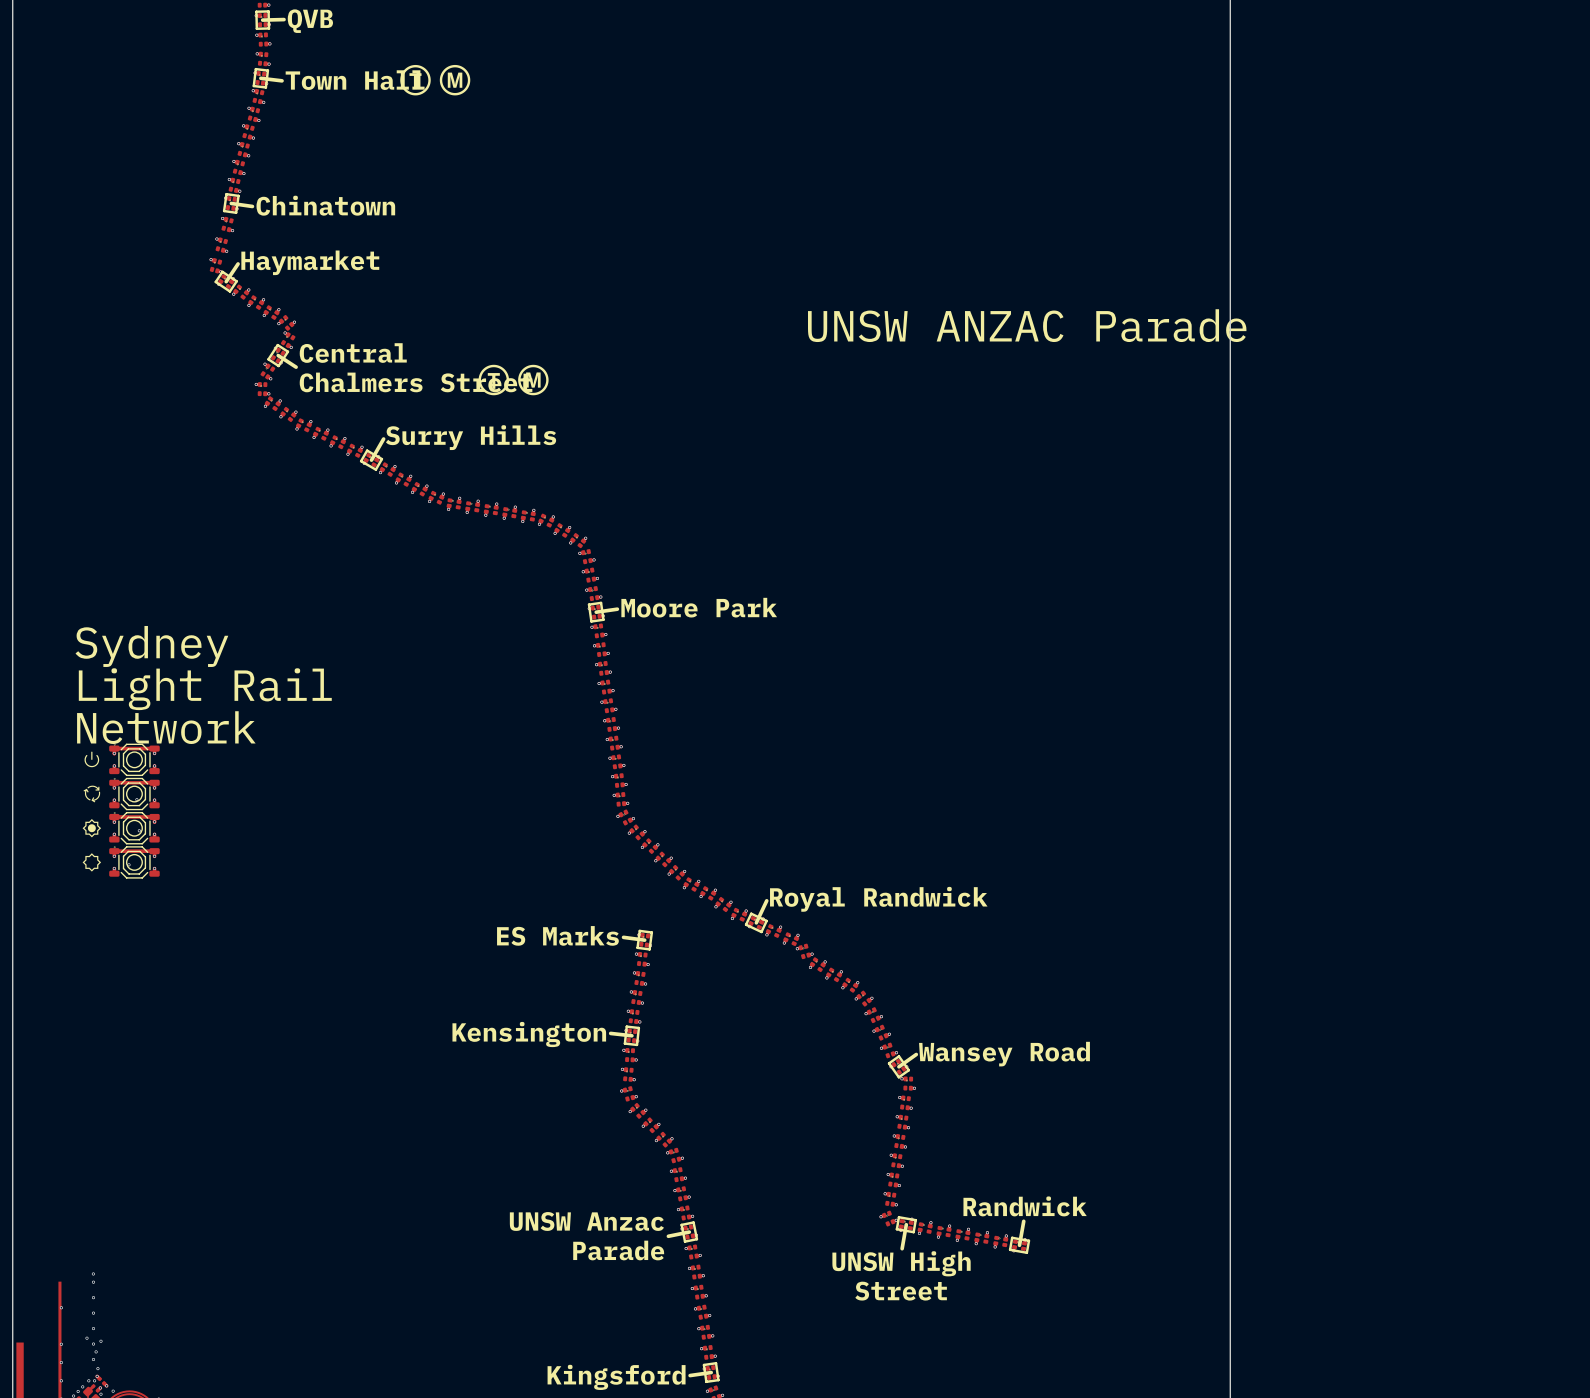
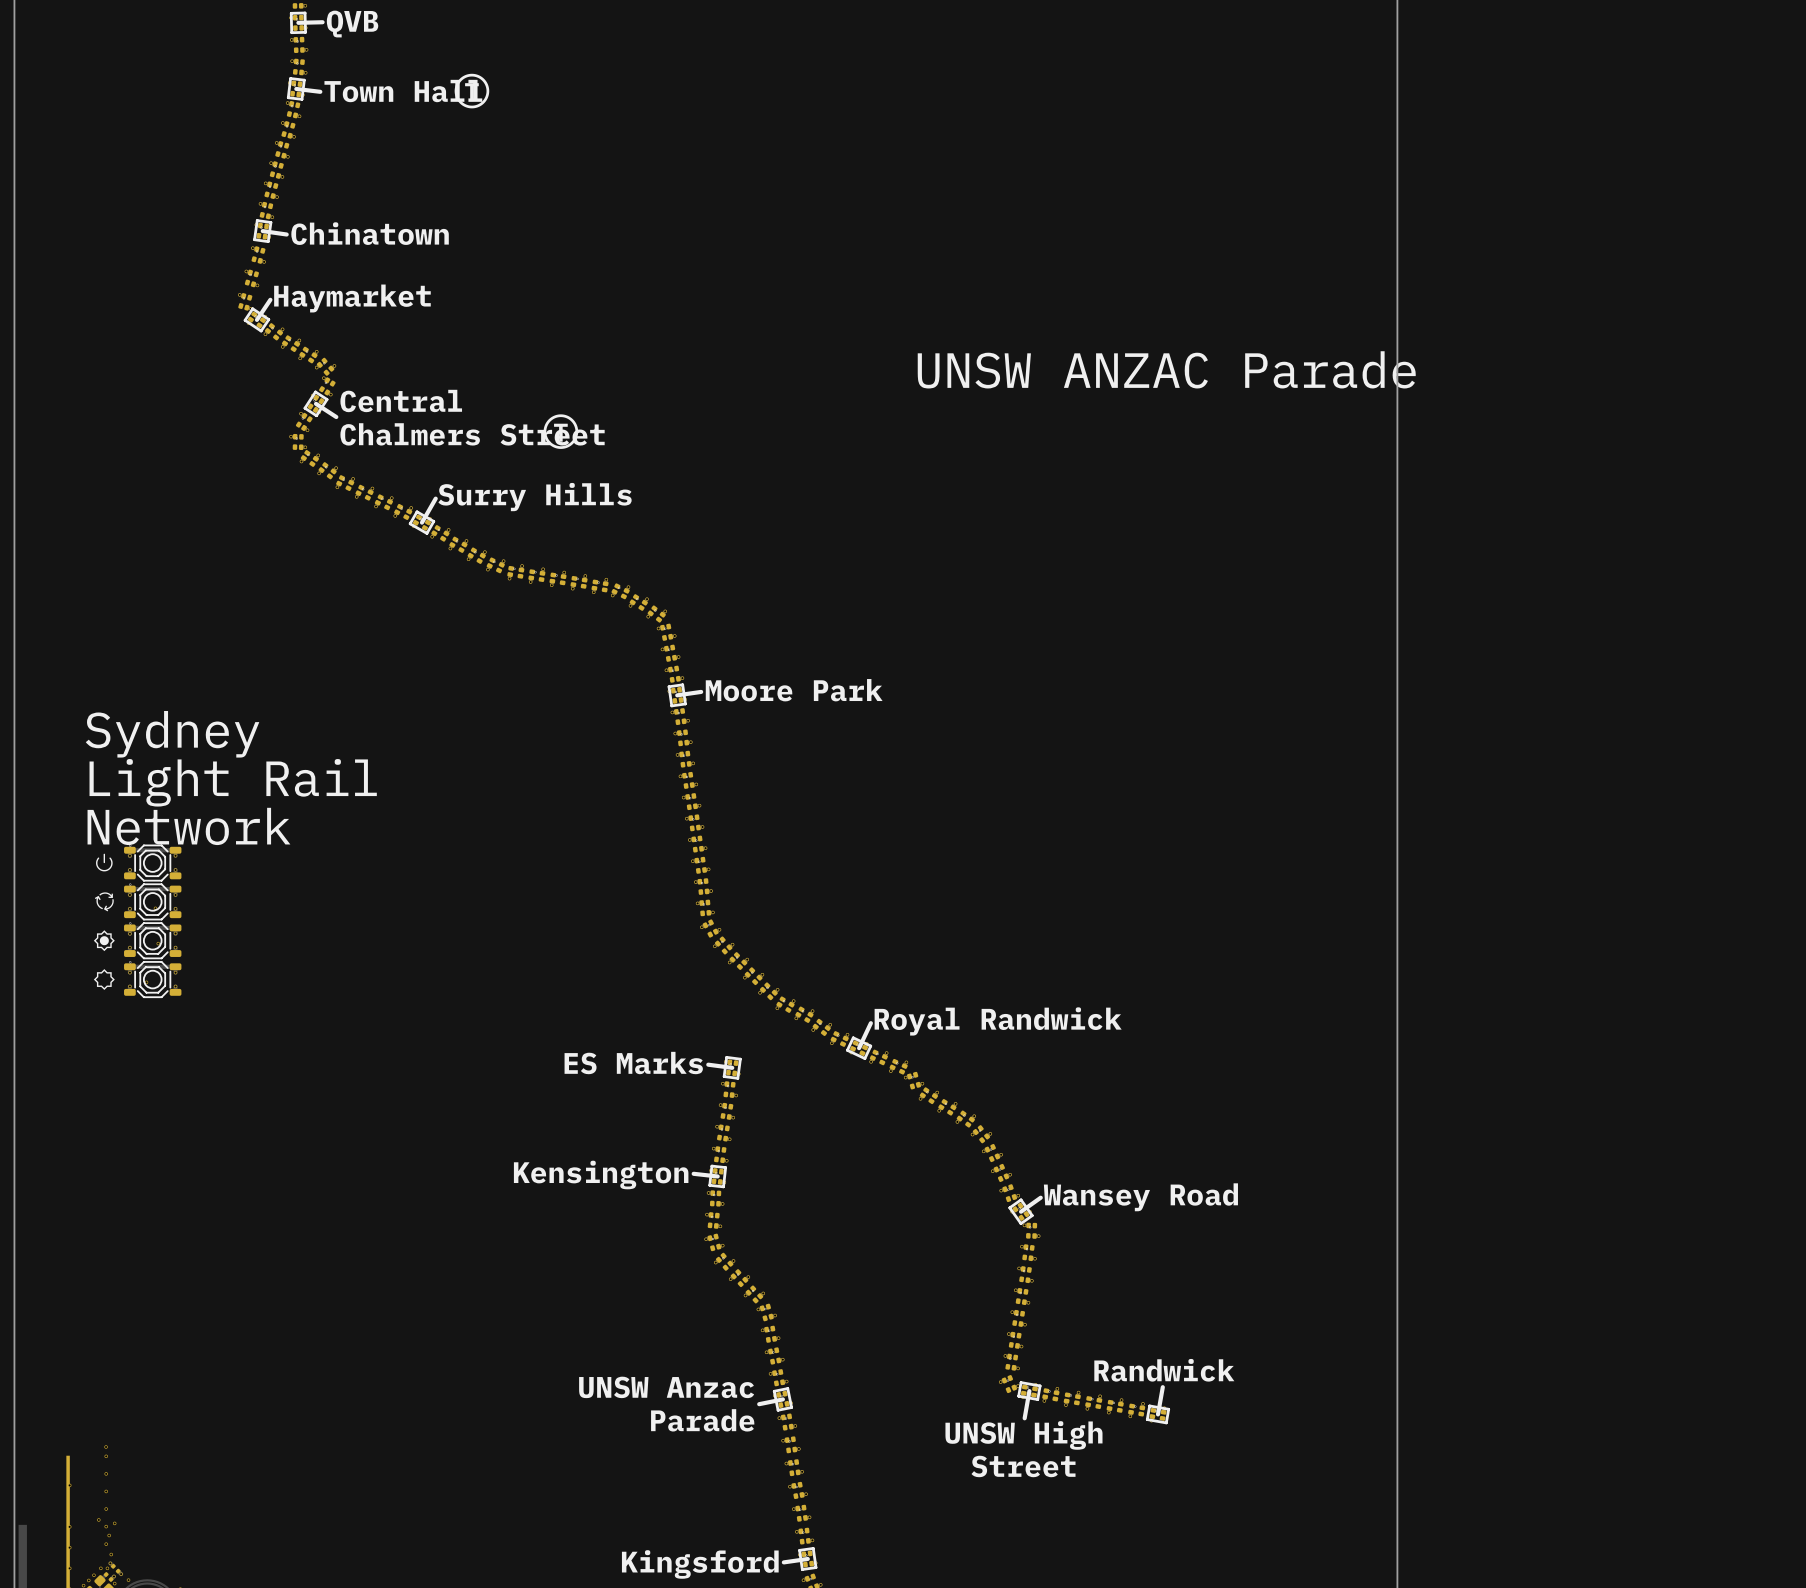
drawing: [439, 64, 471, 96] -> none
drawing: [518, 364, 549, 396] -> none

